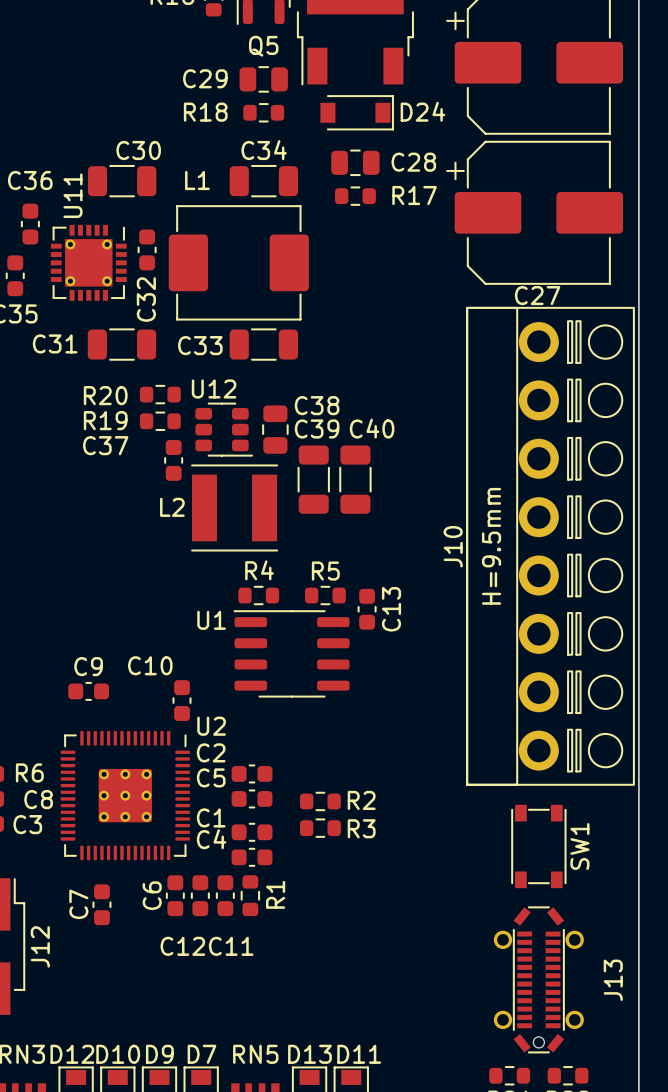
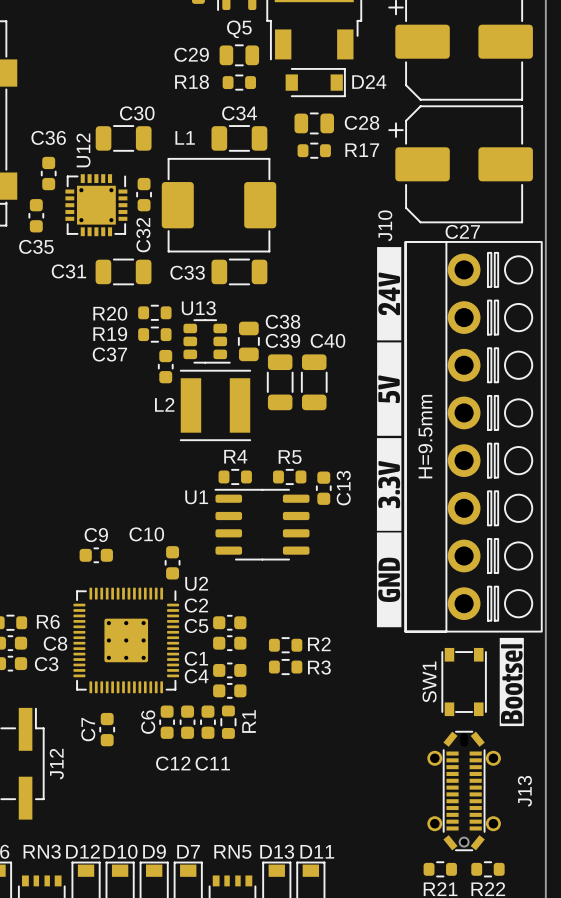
U11 name: U11 (72, 195) -> U12 (83, 150)
drawing: none -> [376, 247, 402, 628]
U12 name: U12 (214, 388) -> U13 (198, 308)
J10 name position: J10 (453, 546) -> J10 (385, 225)
drawing: none -> [499, 637, 524, 727]
SW1 name position: SW1 (579, 846) -> SW1 (429, 682)

